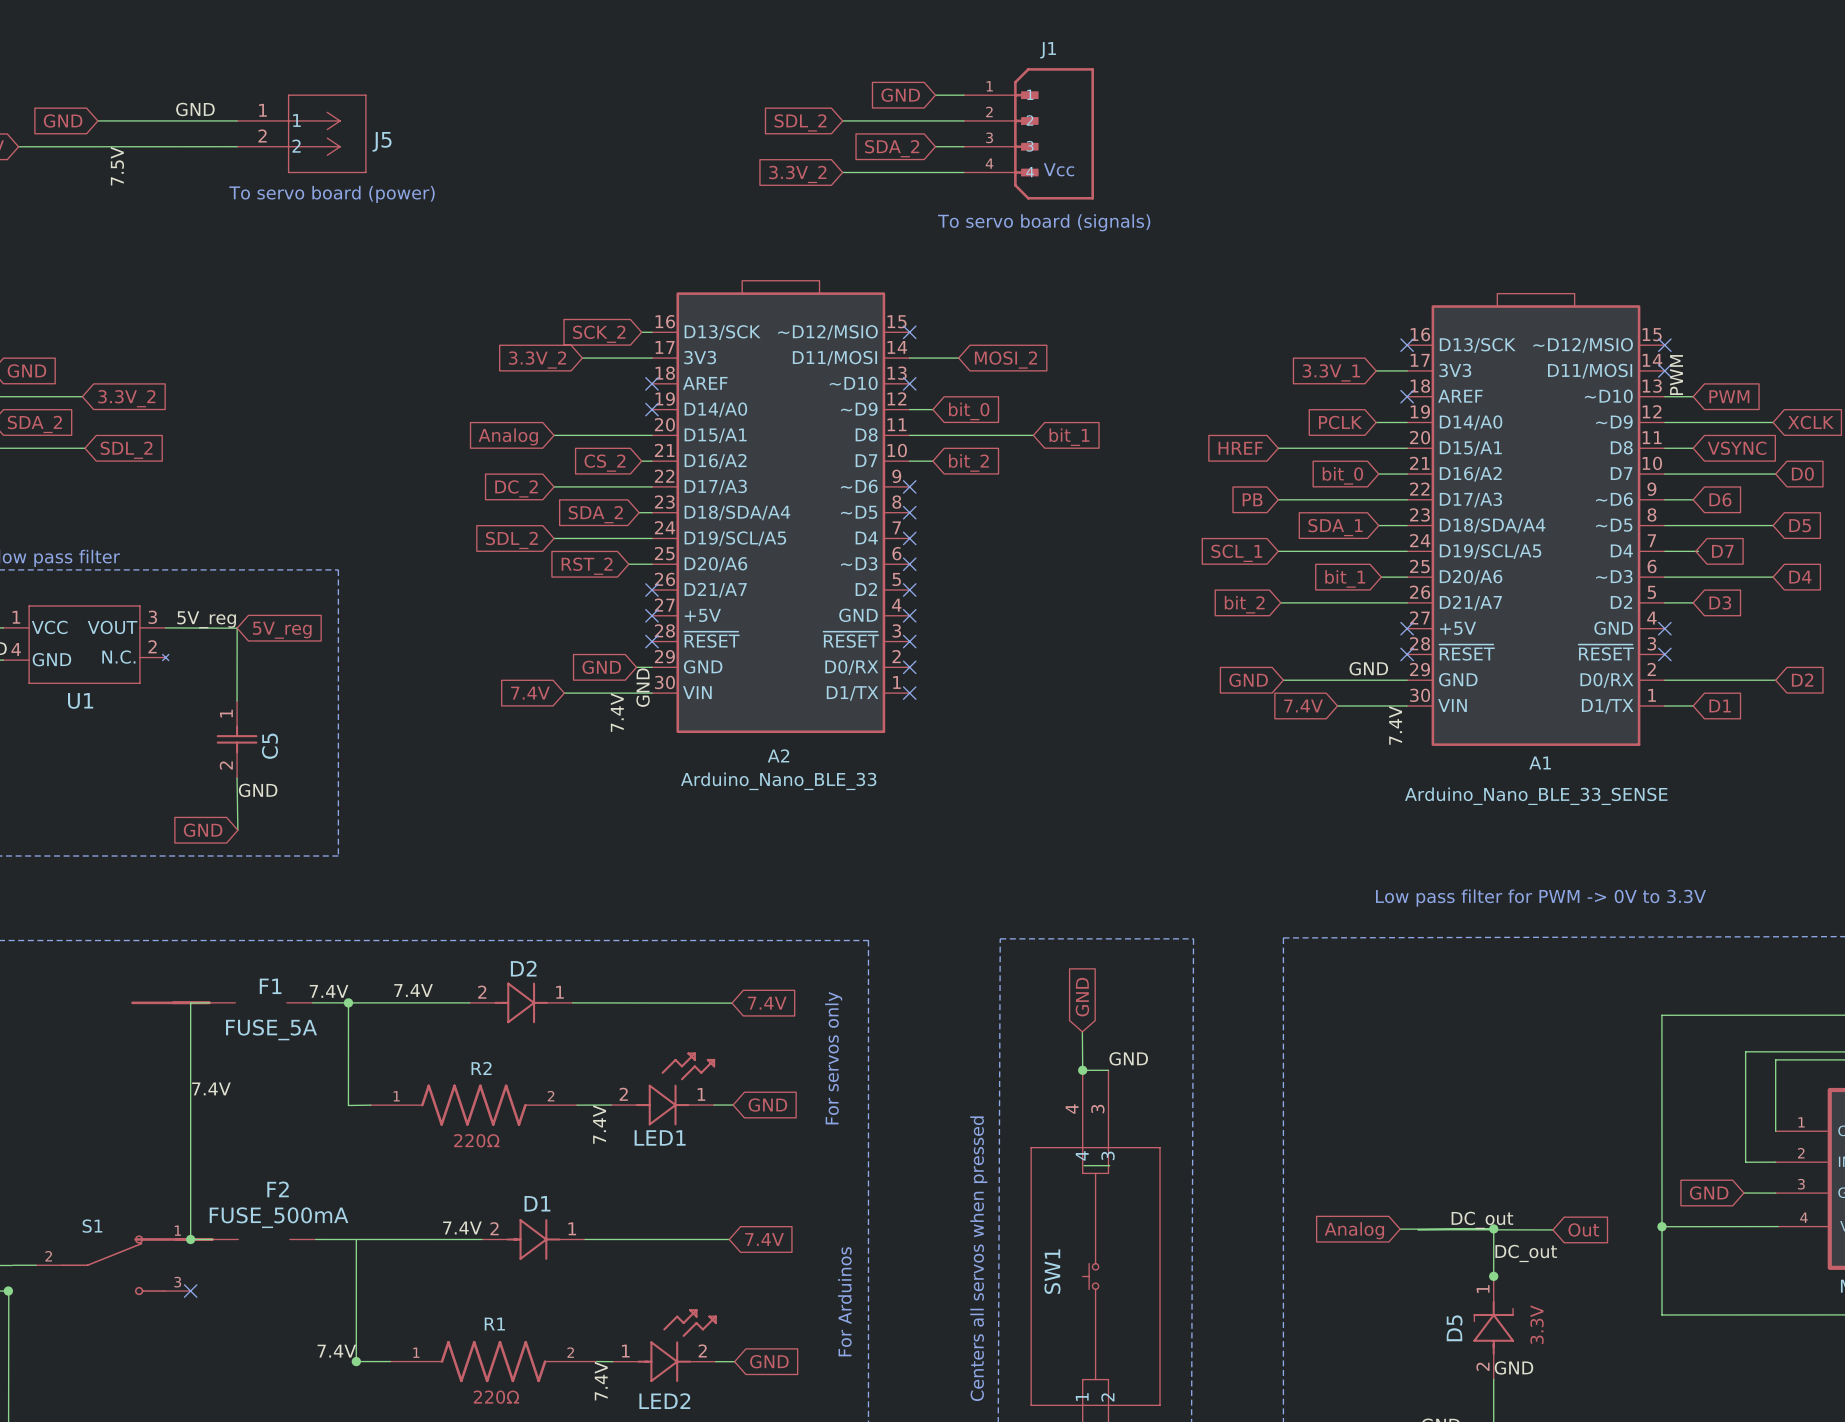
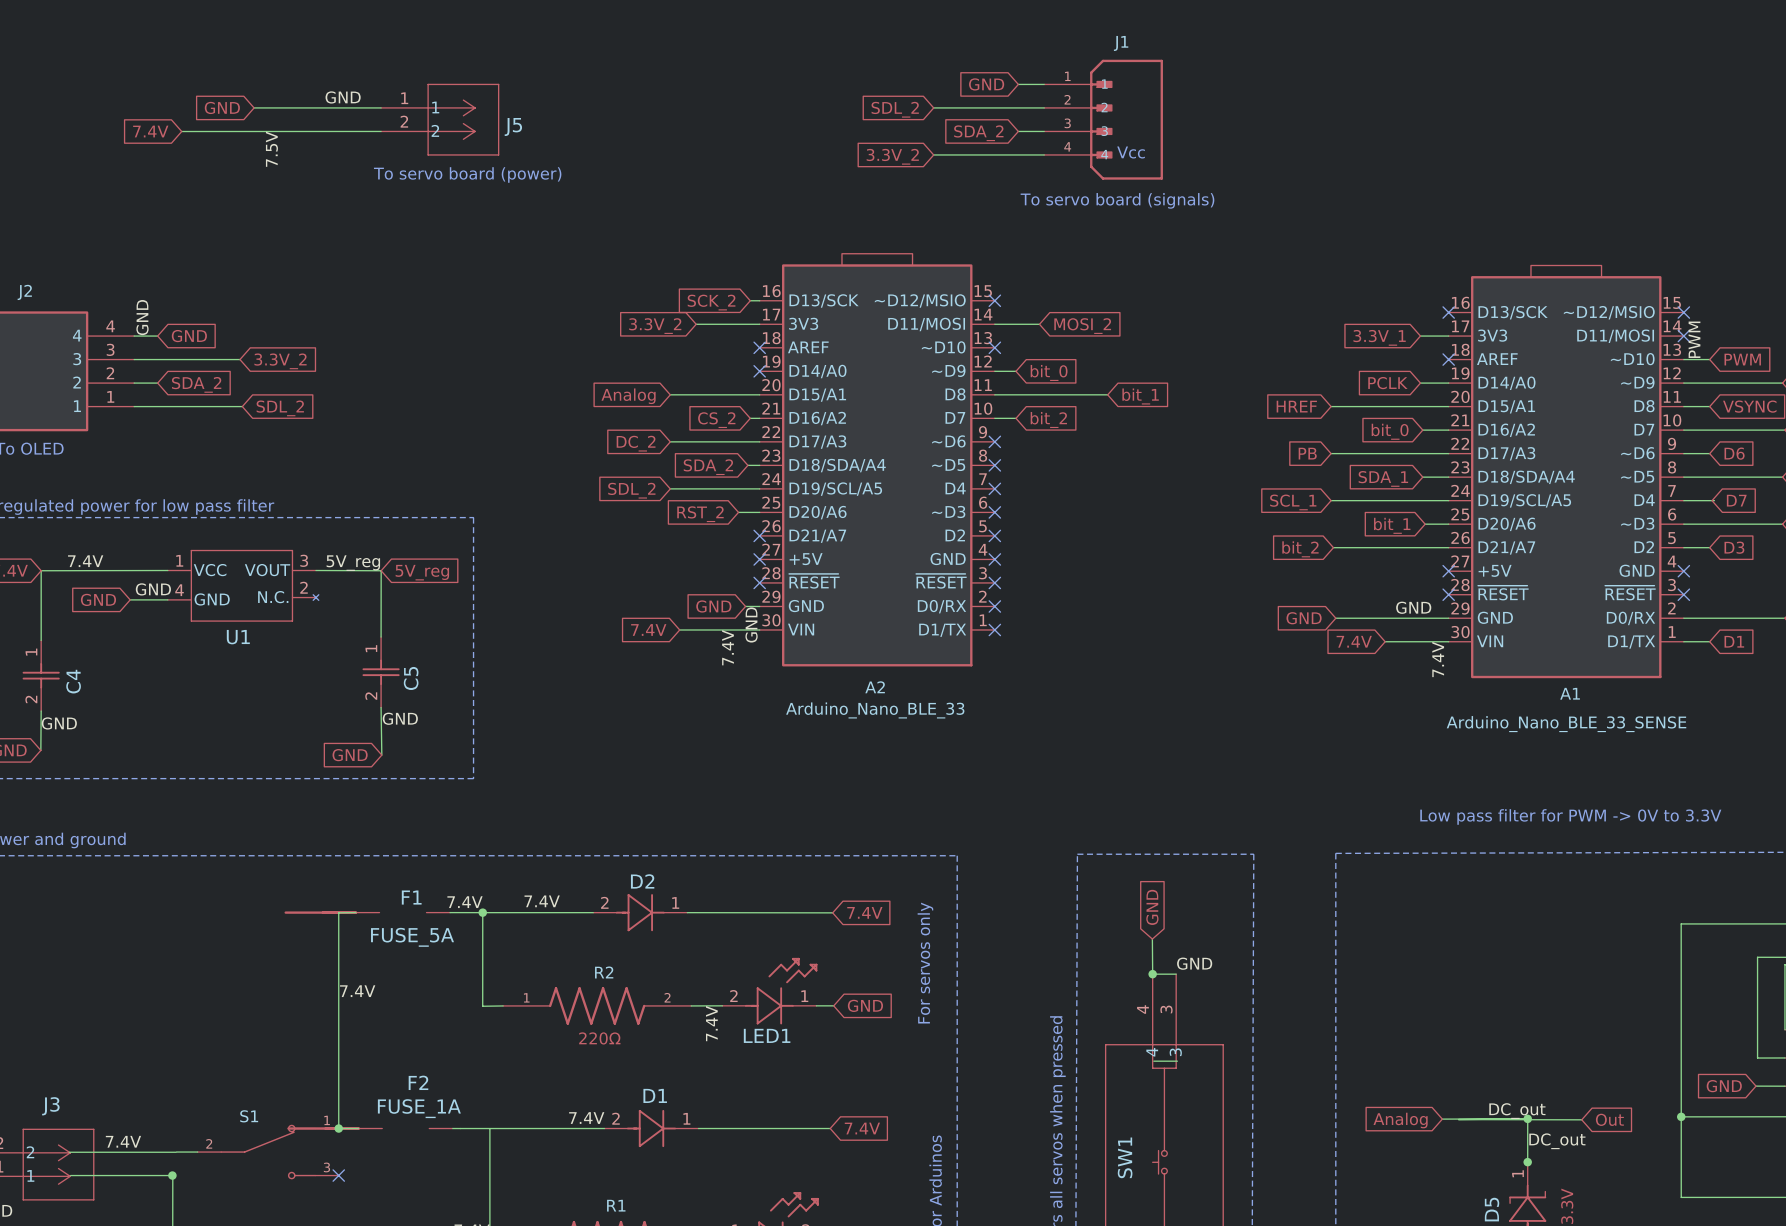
F2 value: FUSE_500mA (279, 1217) -> FUSE_1A (419, 1108)

